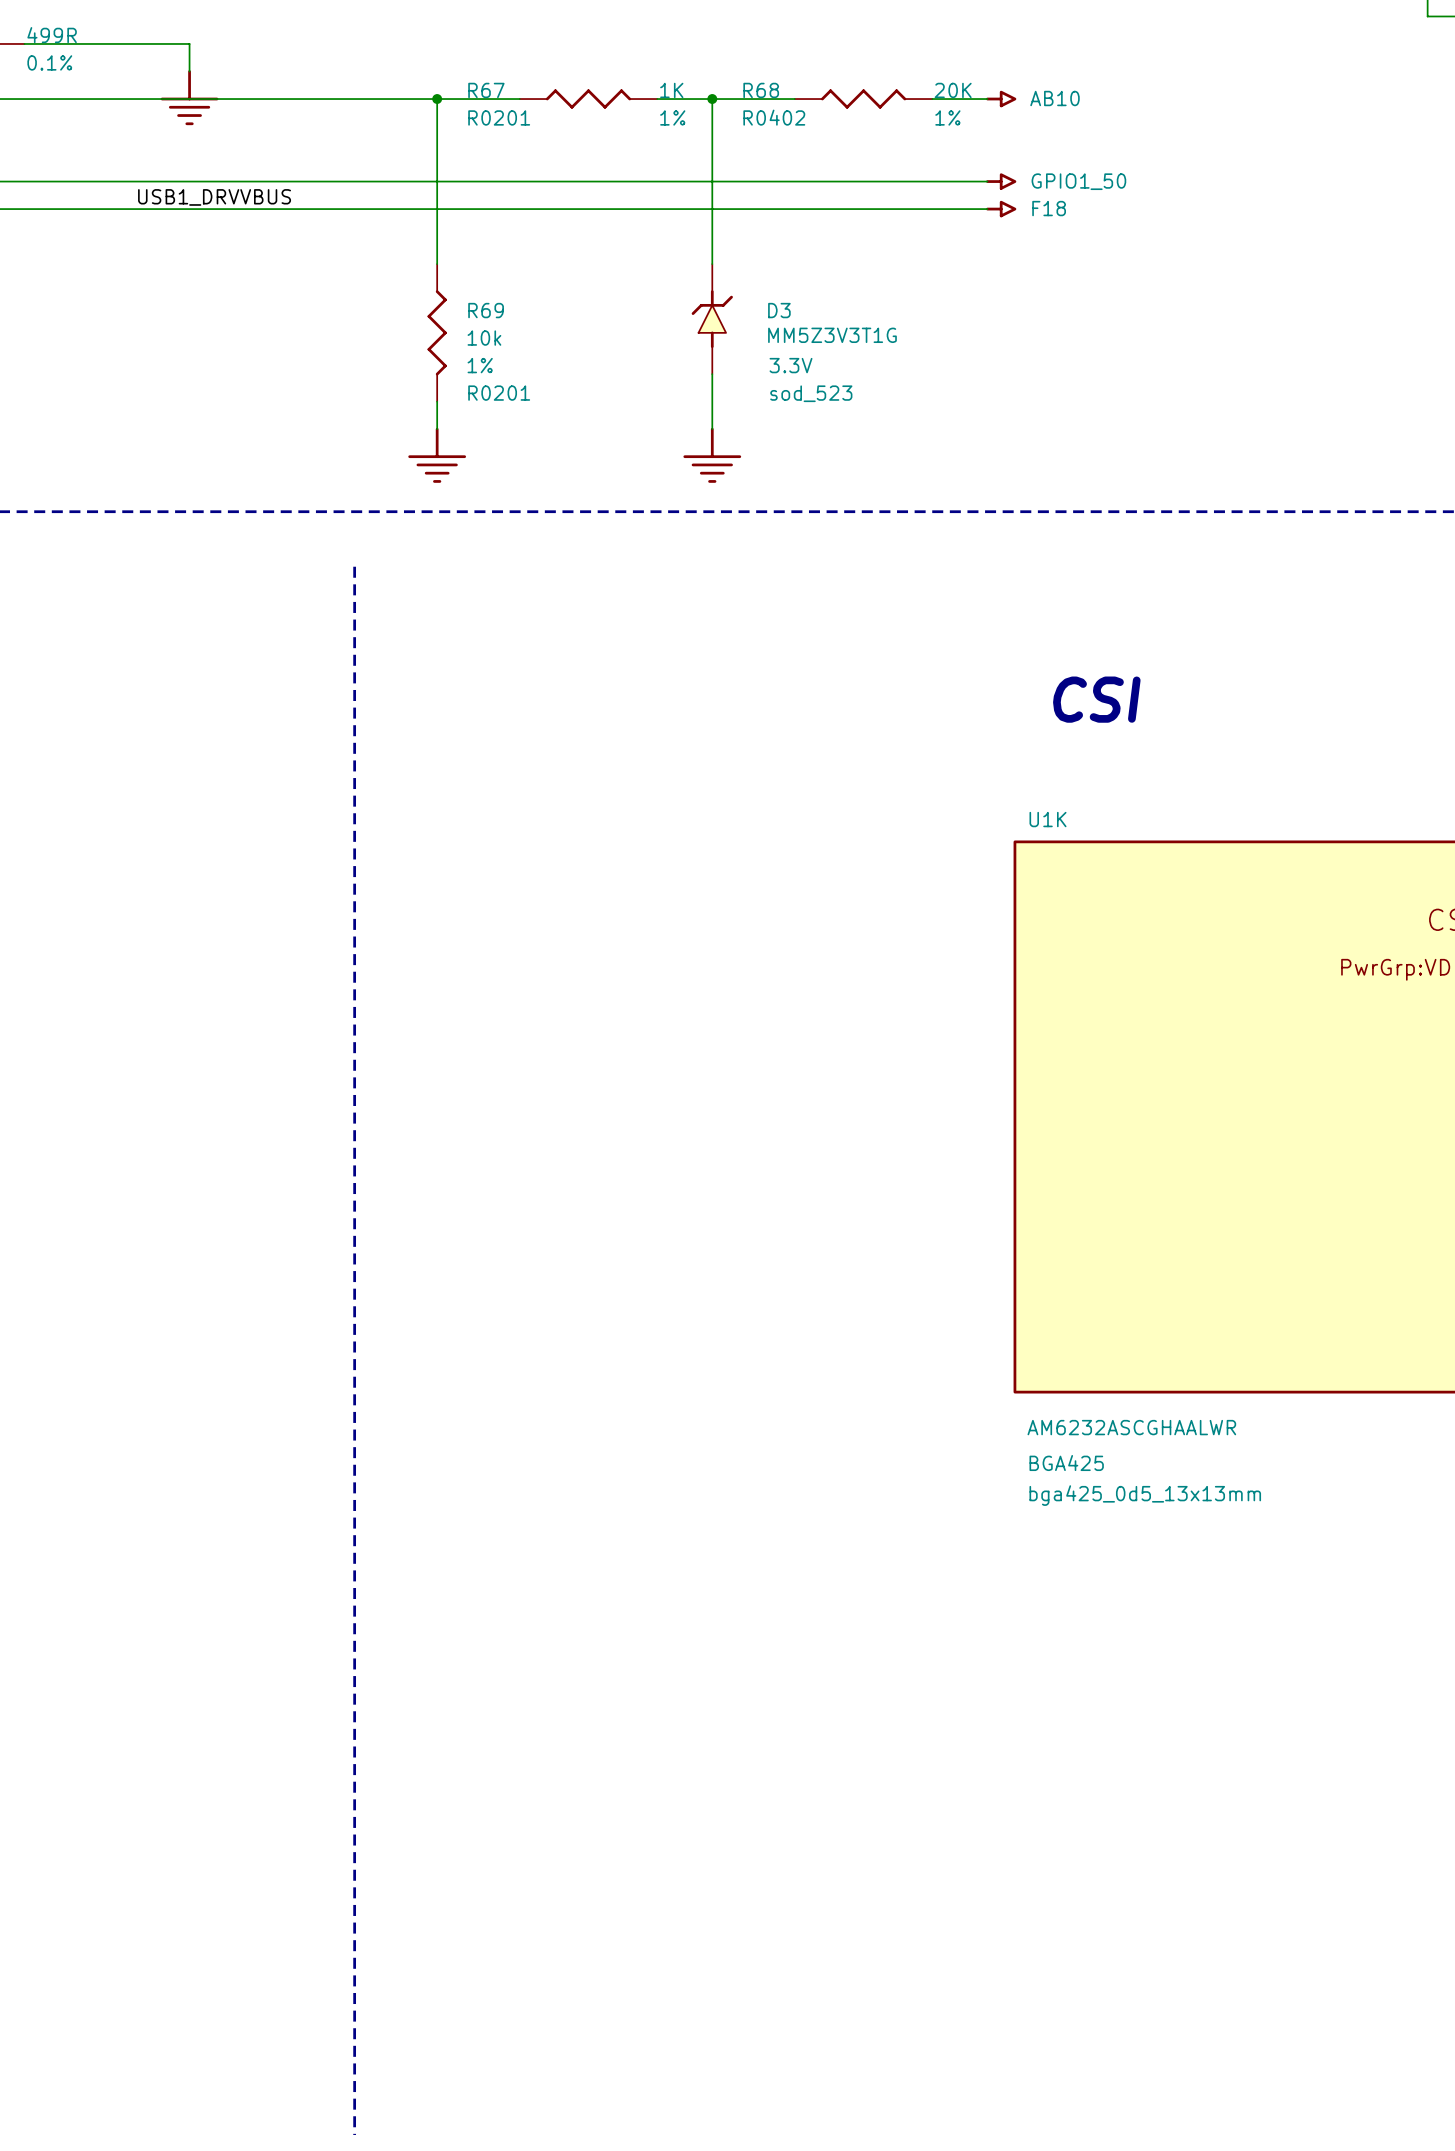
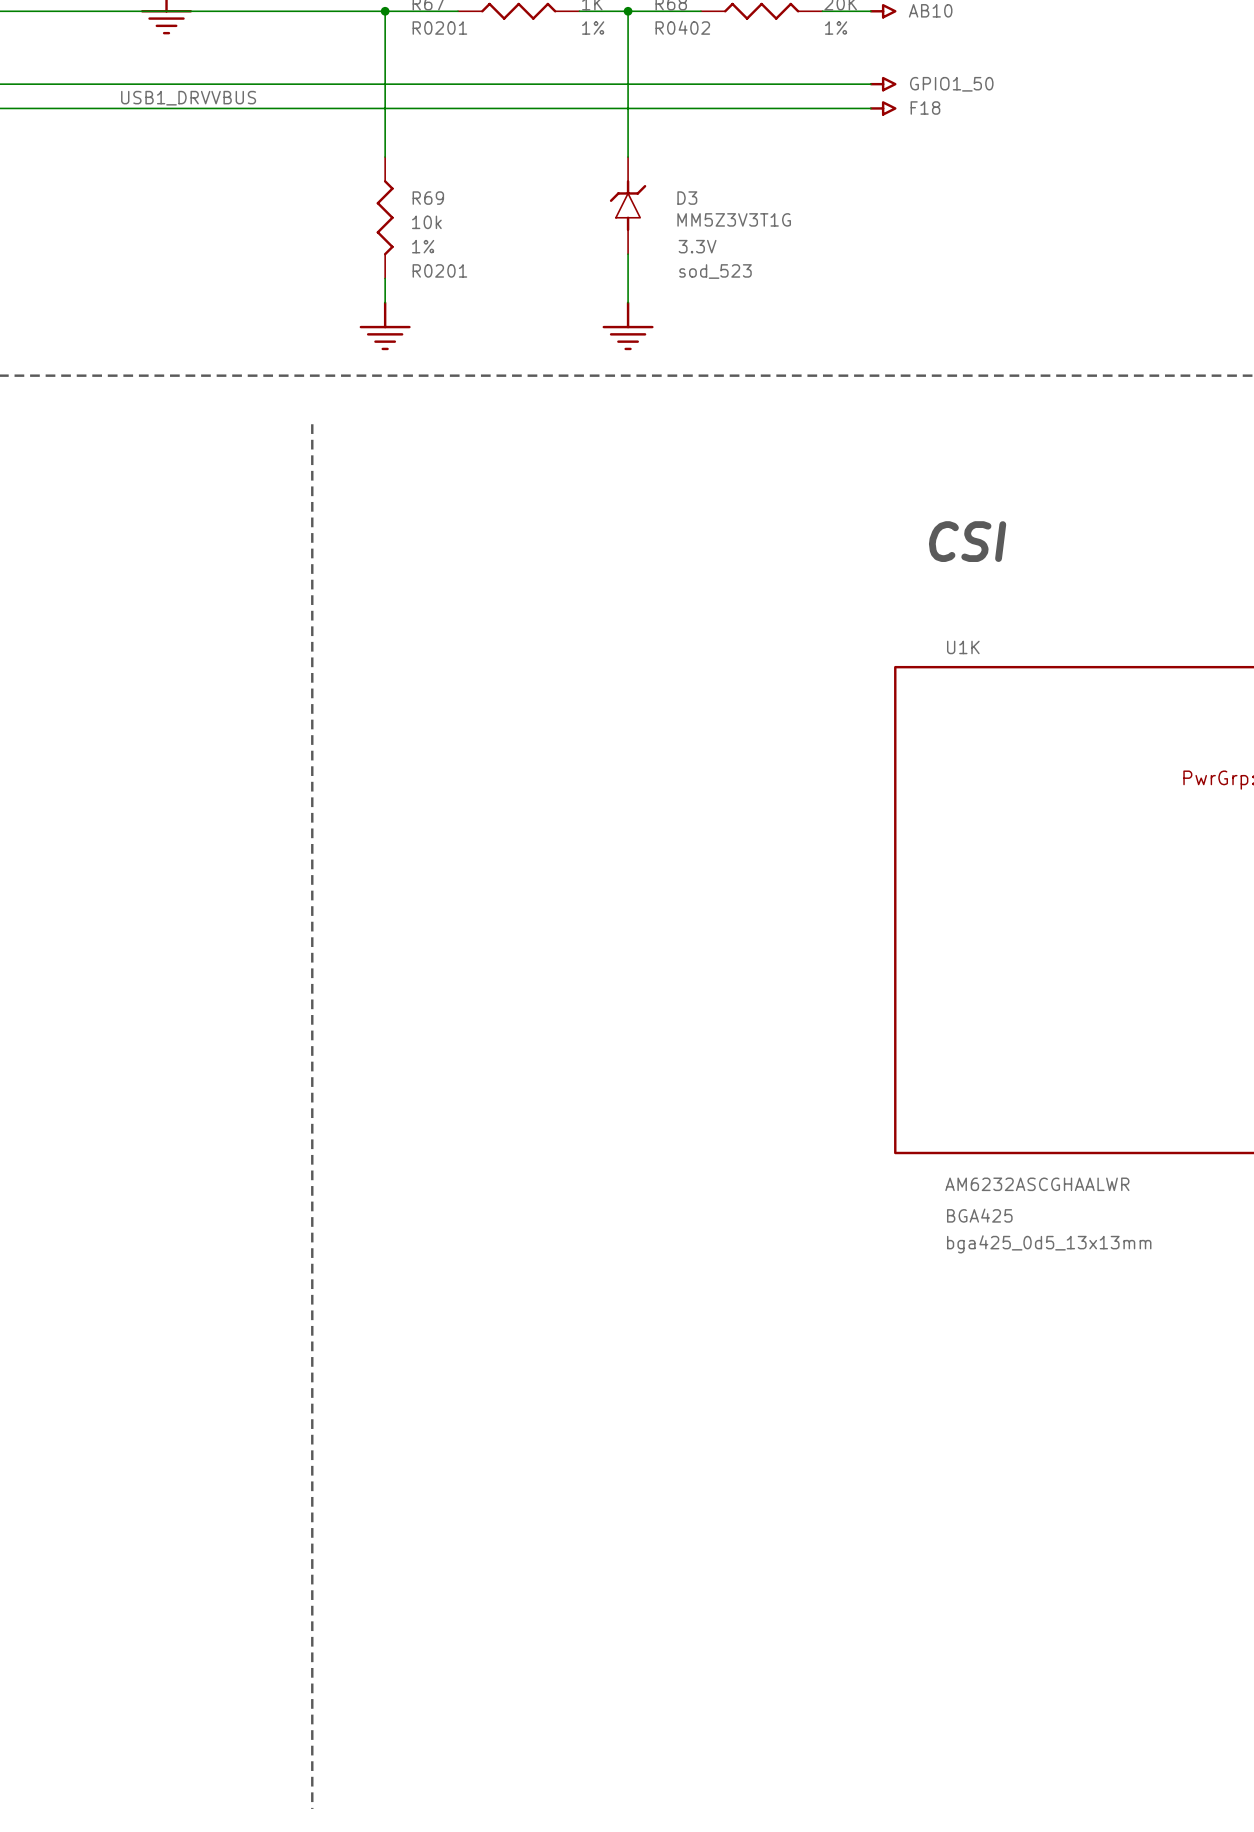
U1K name position: U1K (1047, 819) -> U1K (963, 647)
U1K value position: AM6232ASCGHAALWR (1131, 1427) -> AM6232ASCGHAALWR (1037, 1184)
U1K text position: BGA425 (1066, 1463) -> BGA425 (979, 1215)
U1K text position: bga425_0d5_13x13mm (1145, 1495) -> bga425_0d5_13x13mm (1049, 1244)

